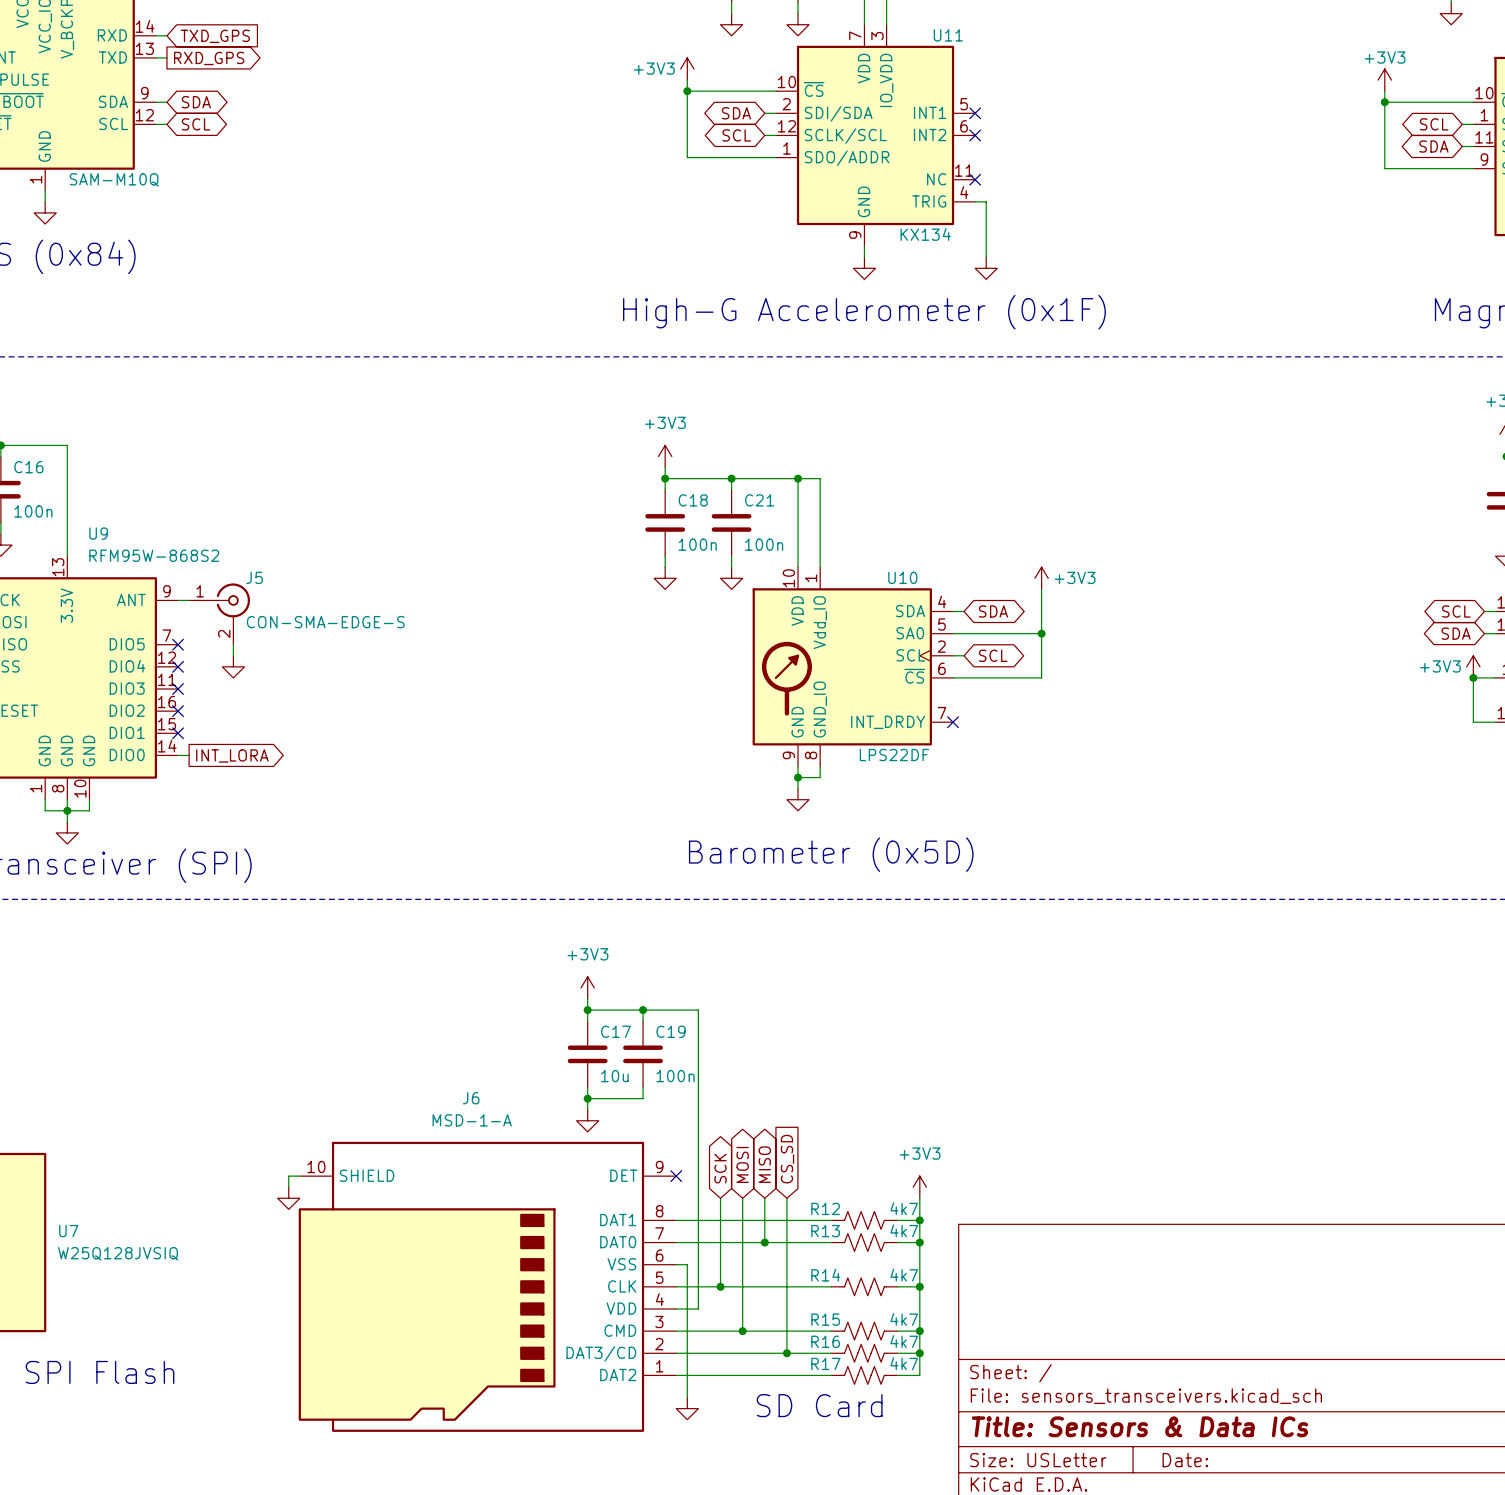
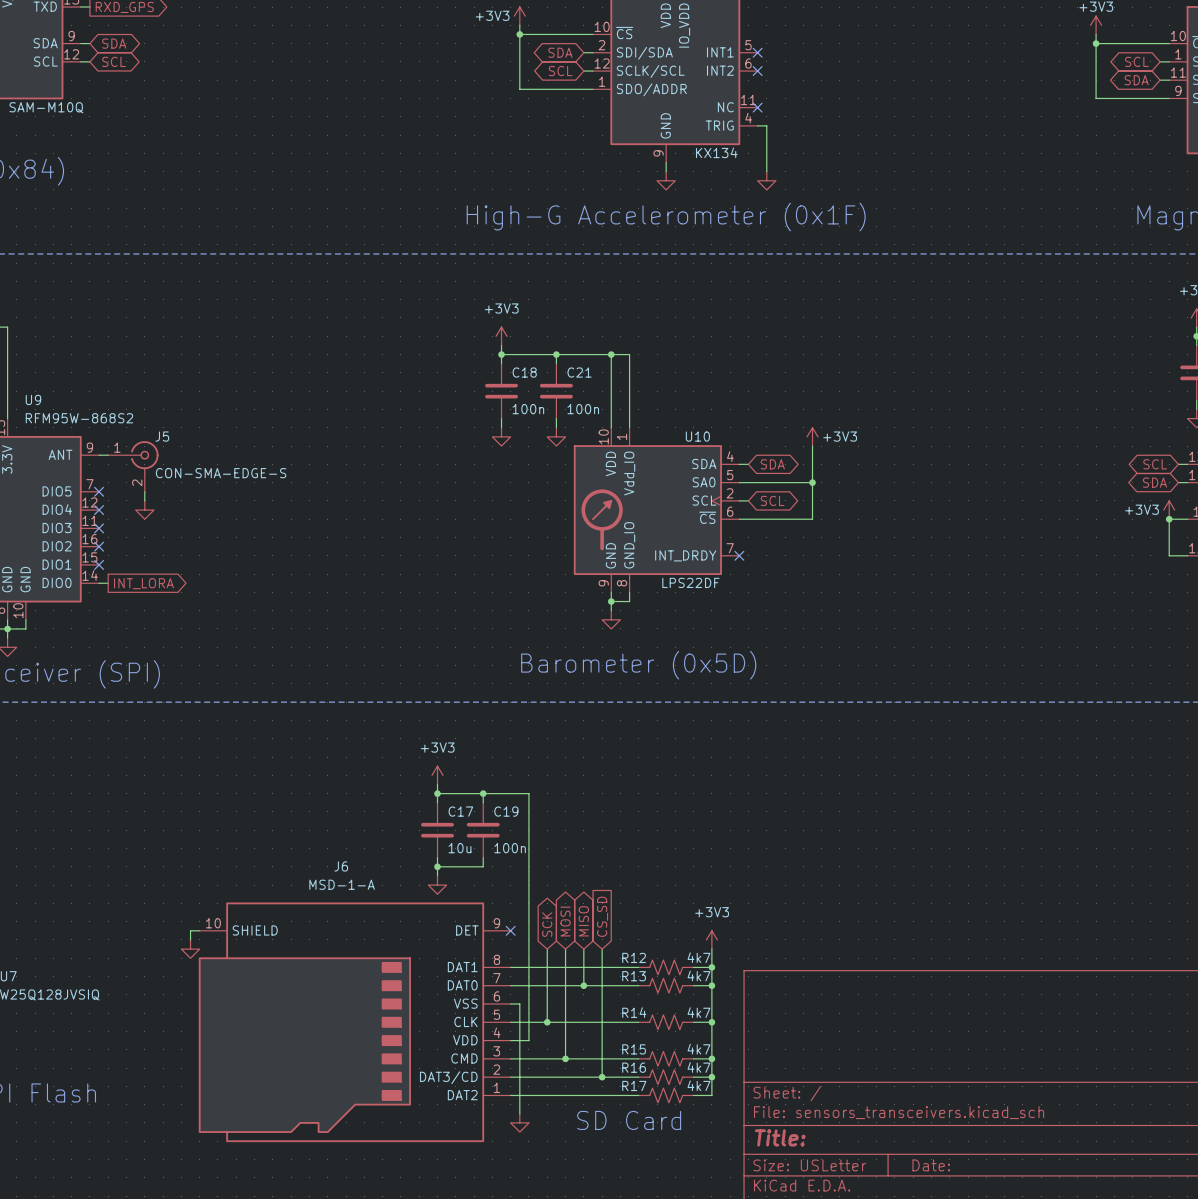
title block: Title: Sensors & Data ICs (1140, 1426) -> Title: (780, 1137)

